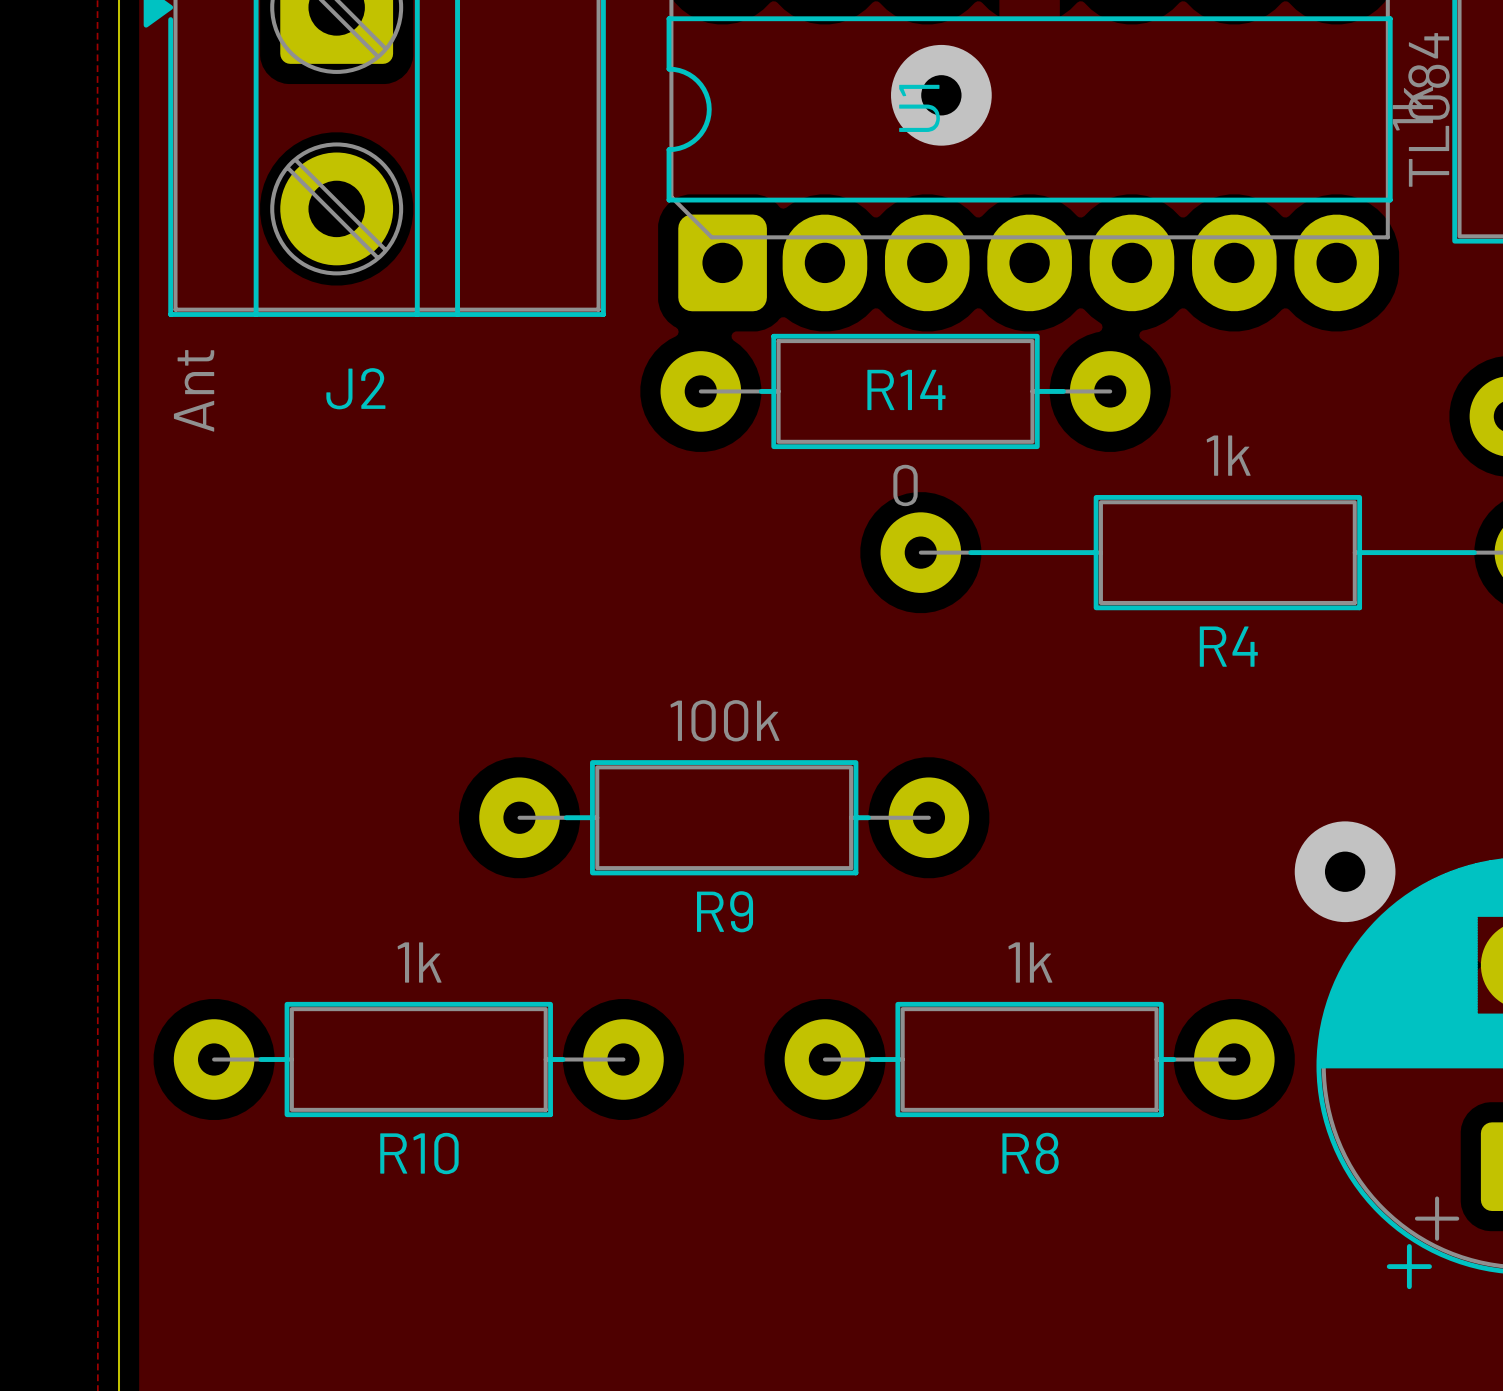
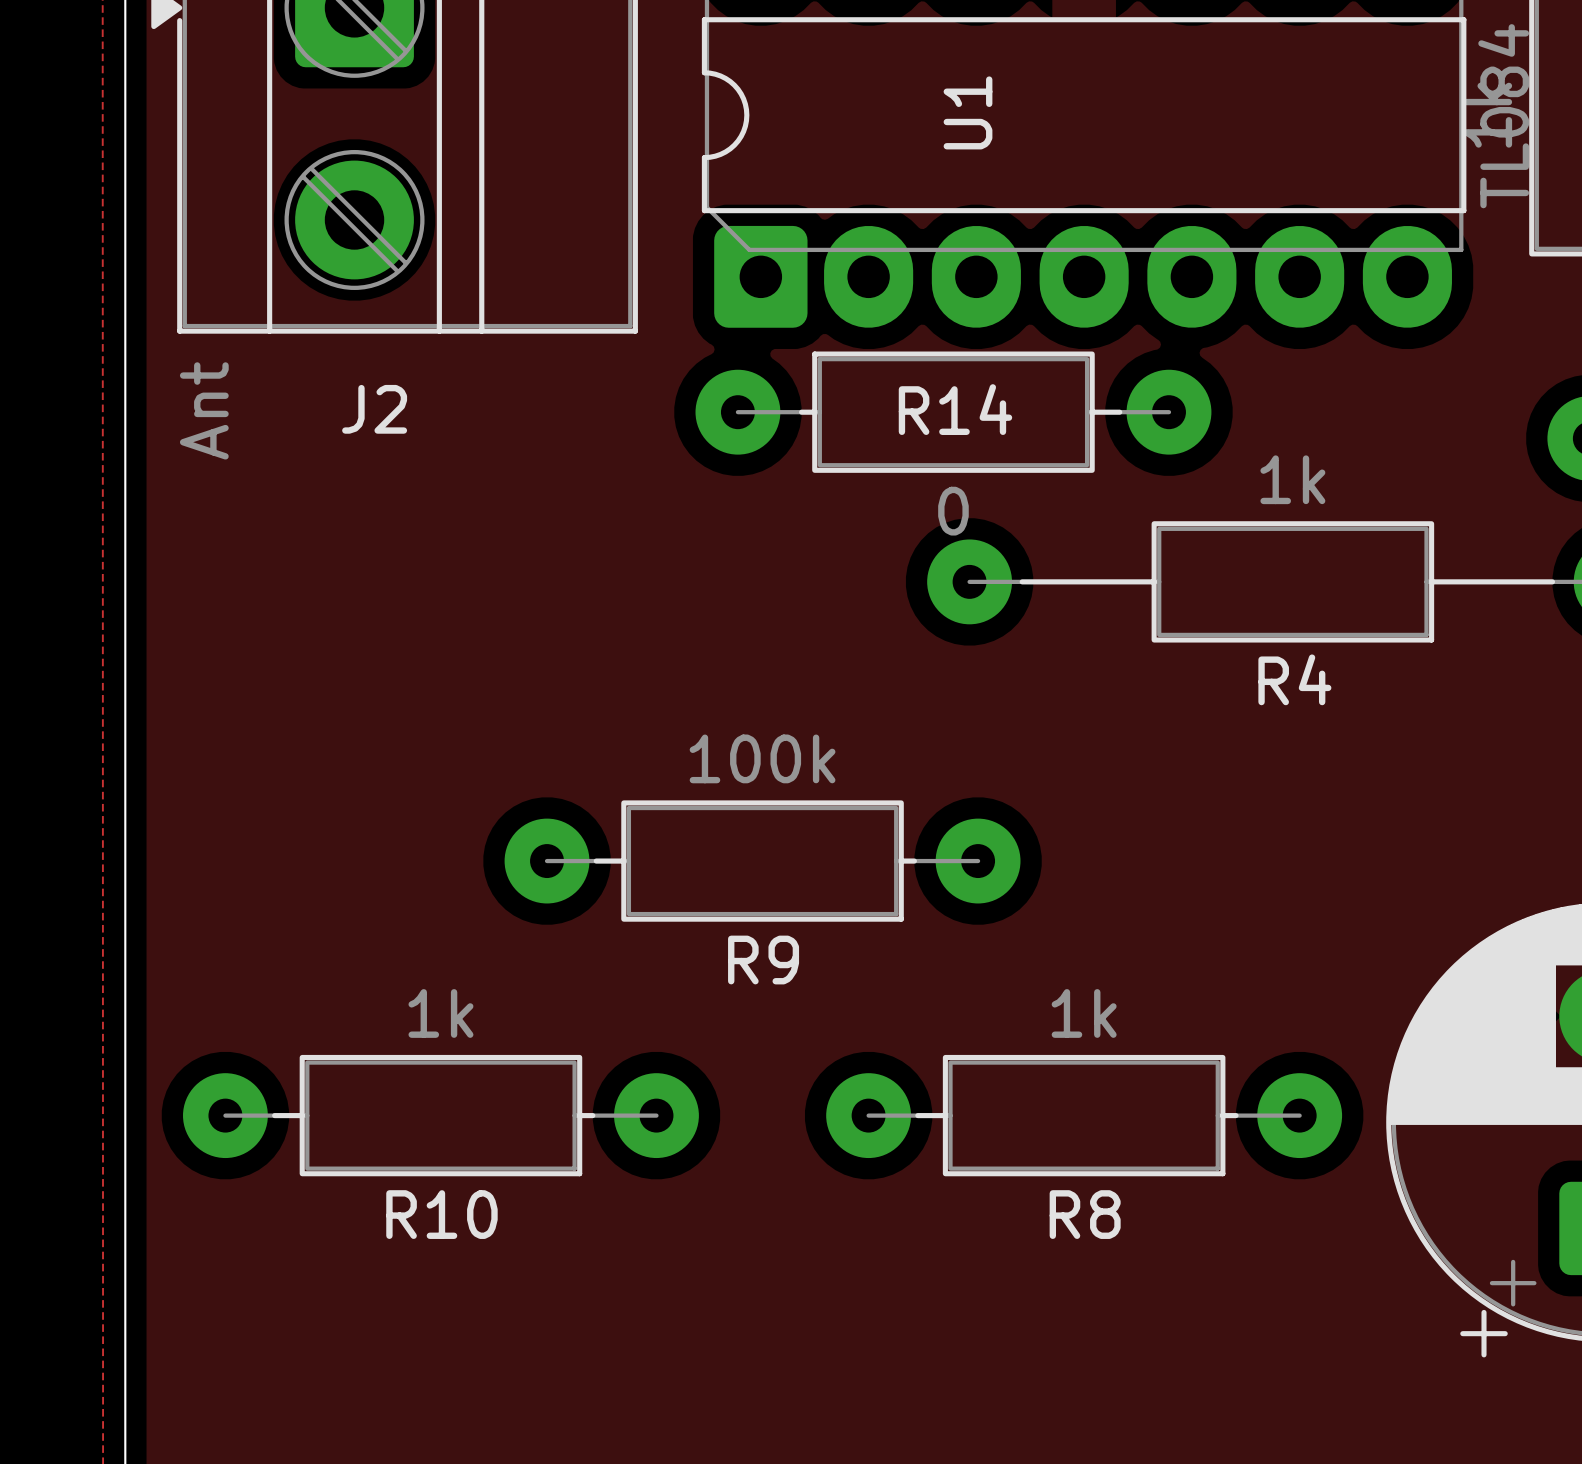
via: (941, 95) -> none
via: (1345, 871) -> none

